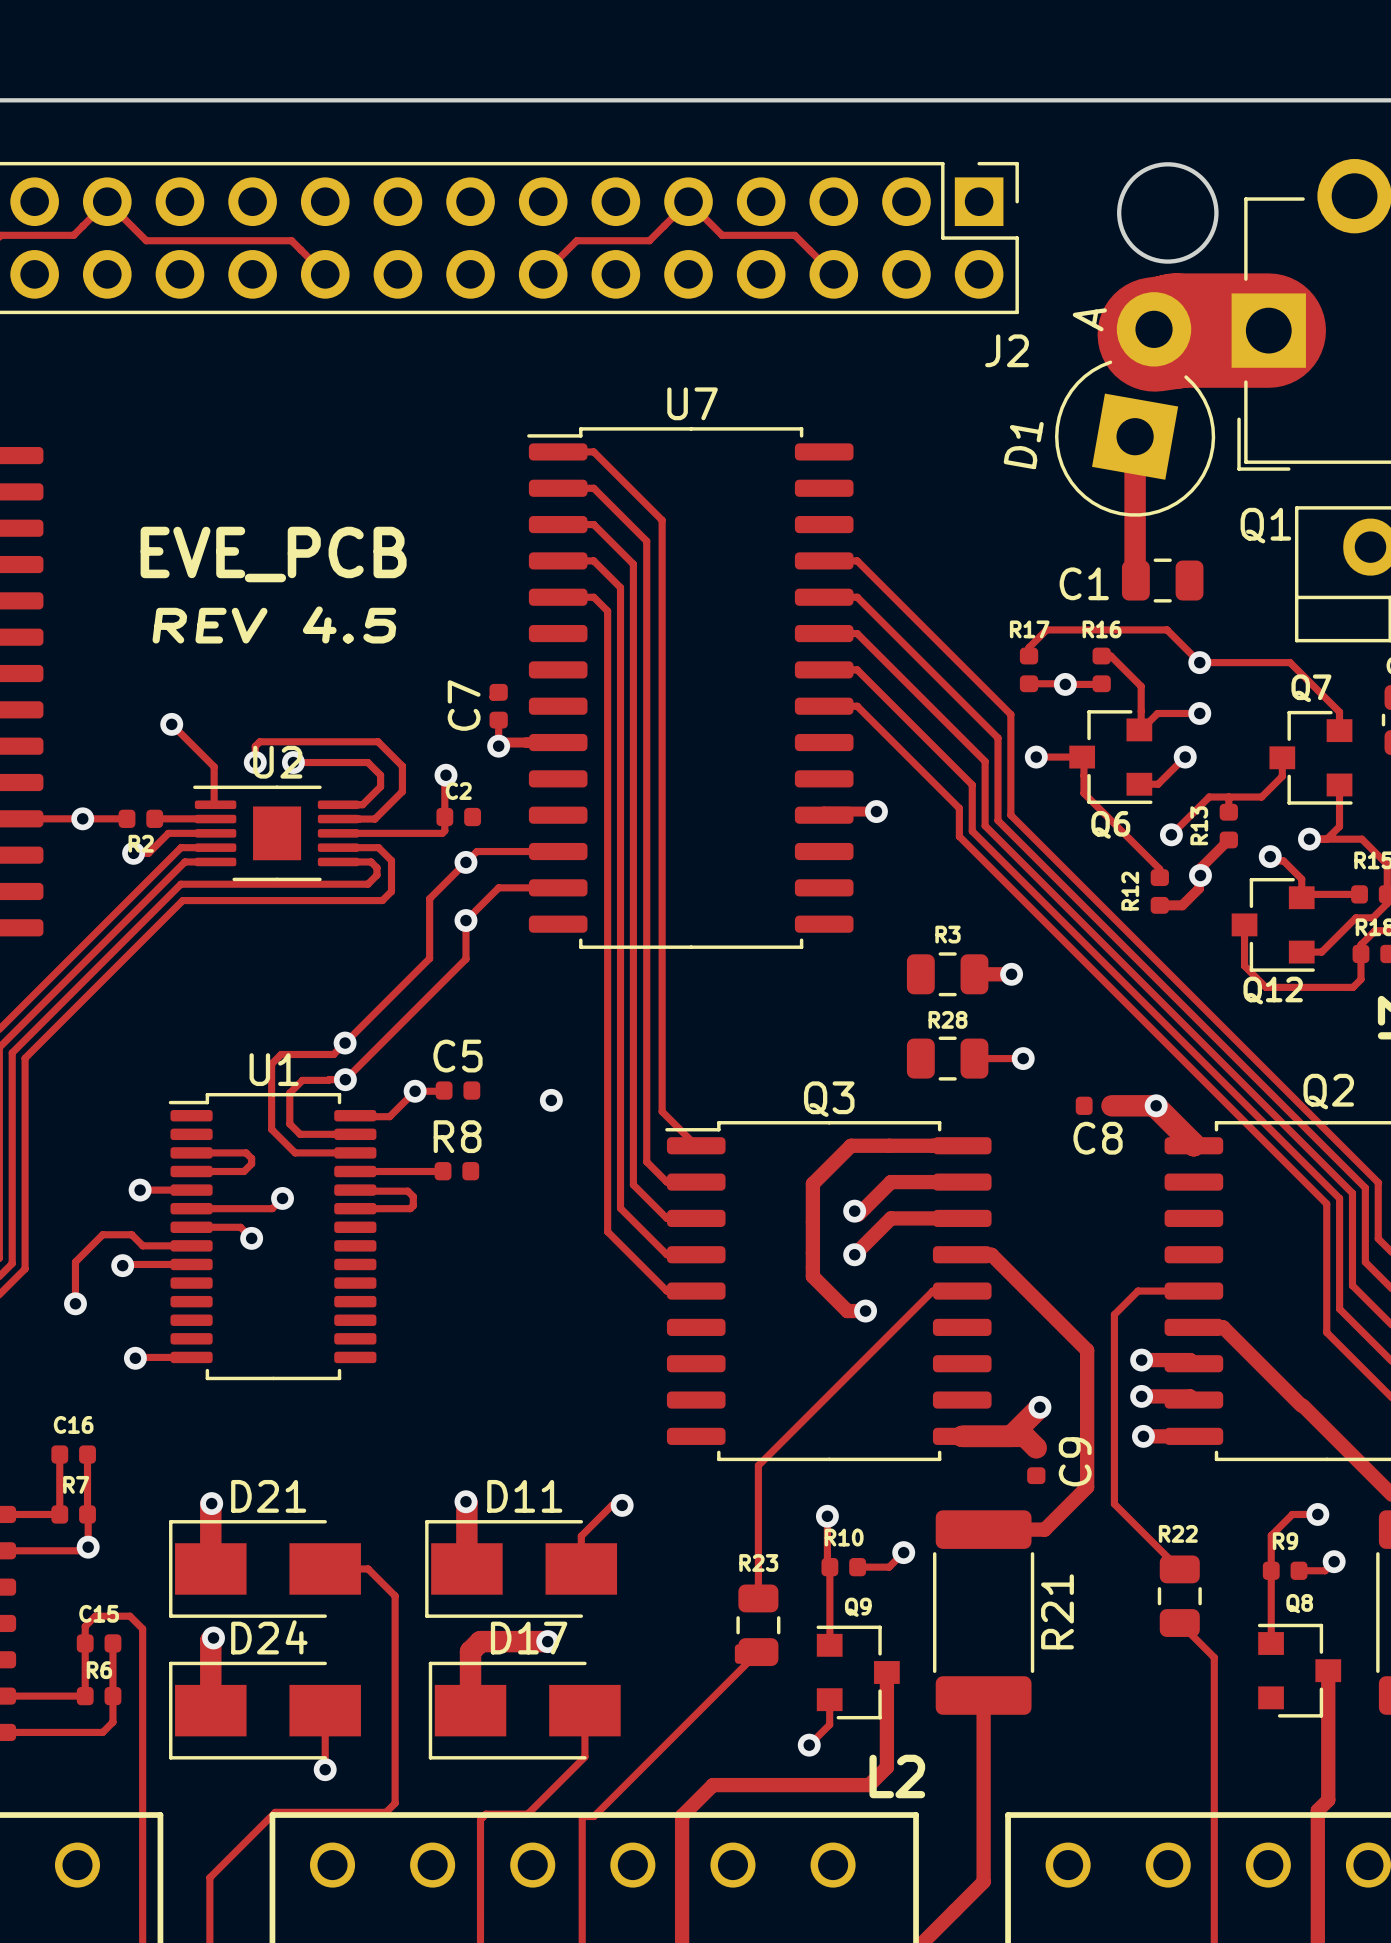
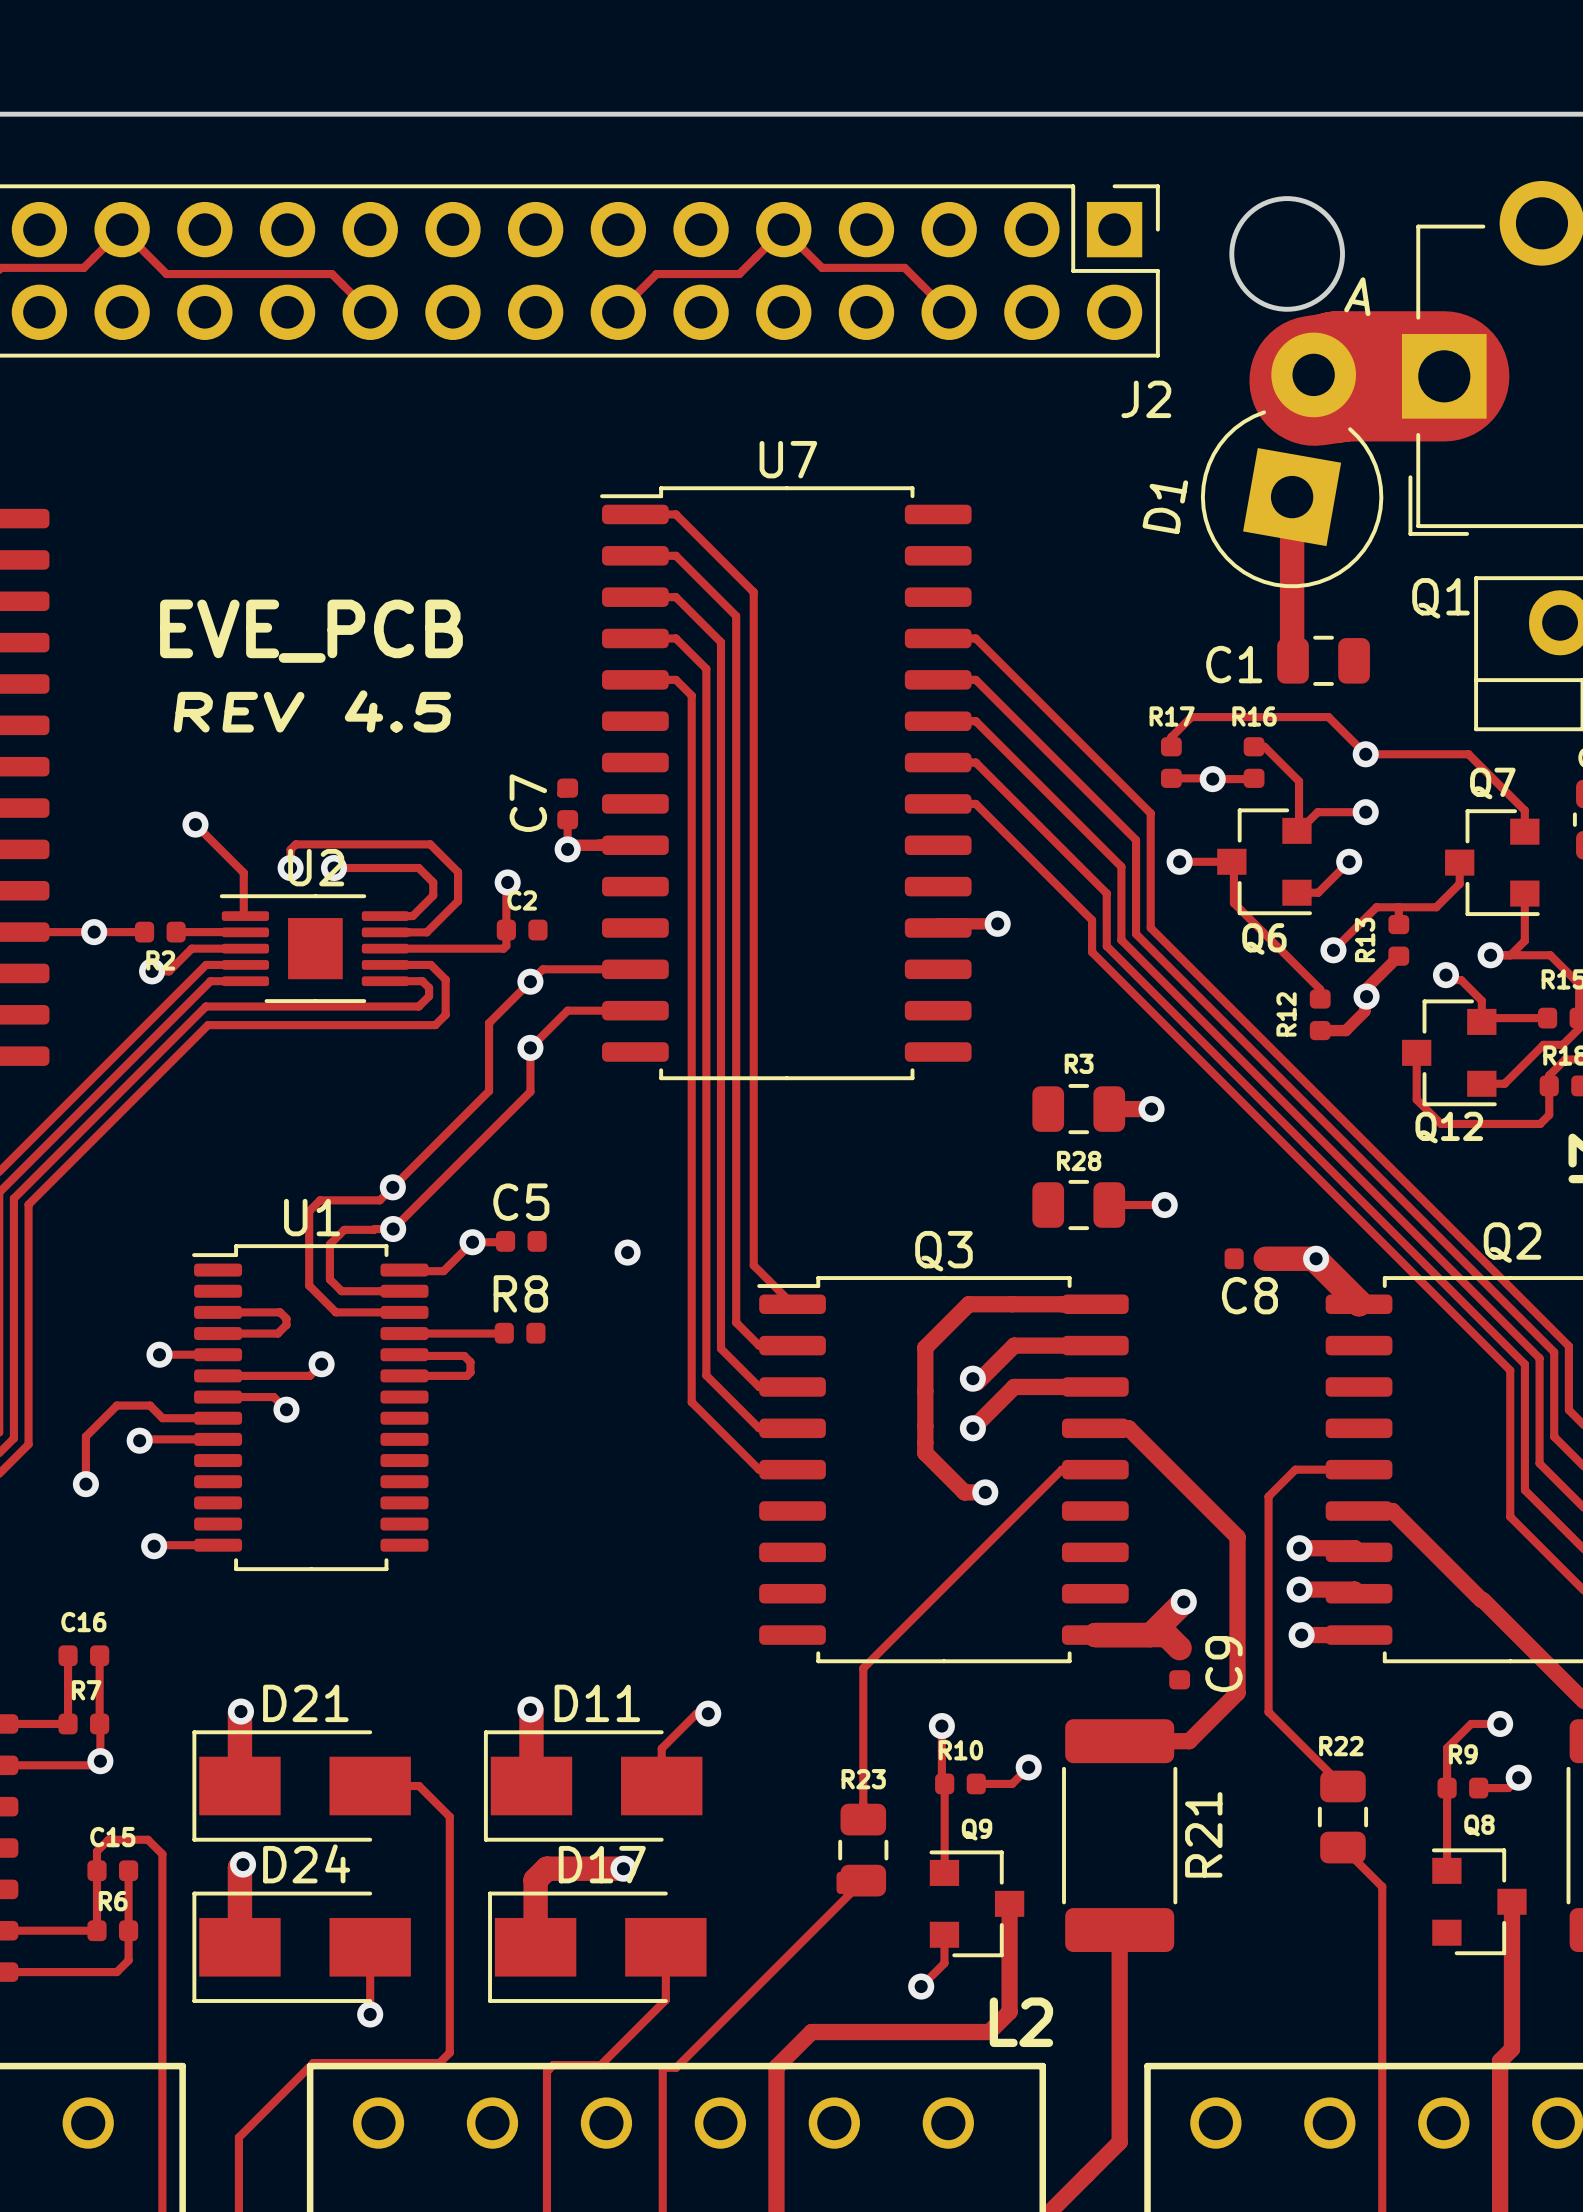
round board edge position: (1167, 212) -> (1287, 253)
D1 text rotation: 0° (1089, 319) -> 90° clockwise (1357, 296)
D1 text position: A (1089, 319) -> A (1357, 296)

